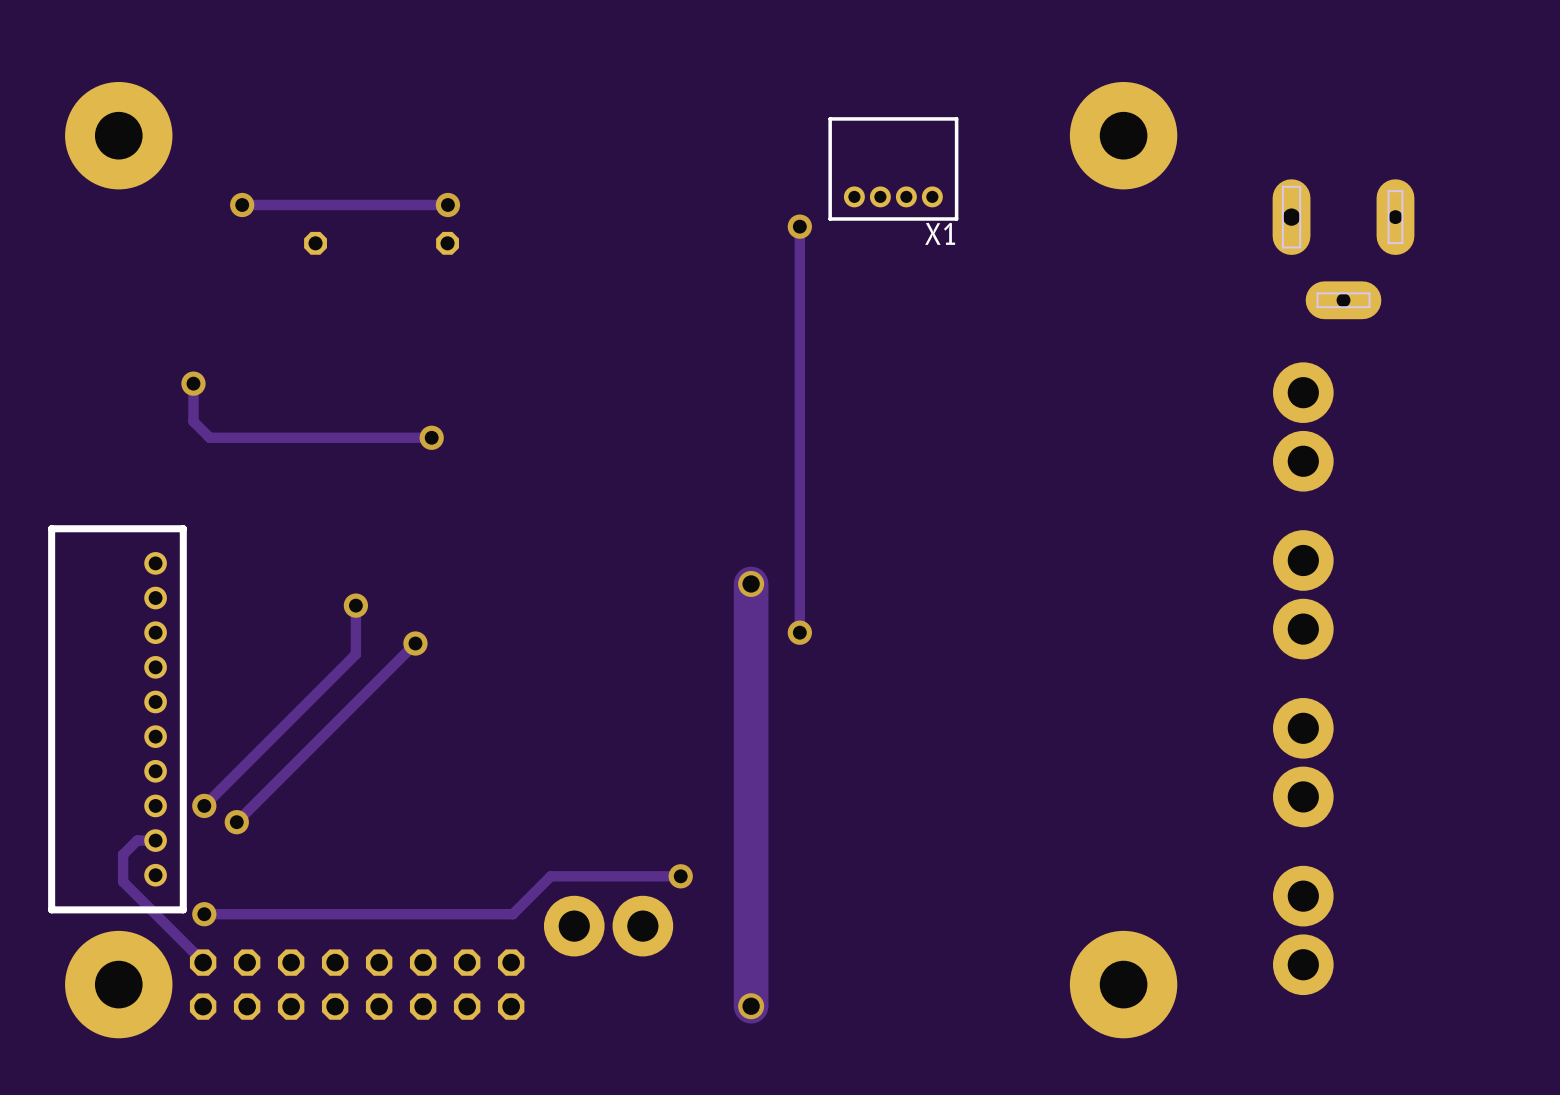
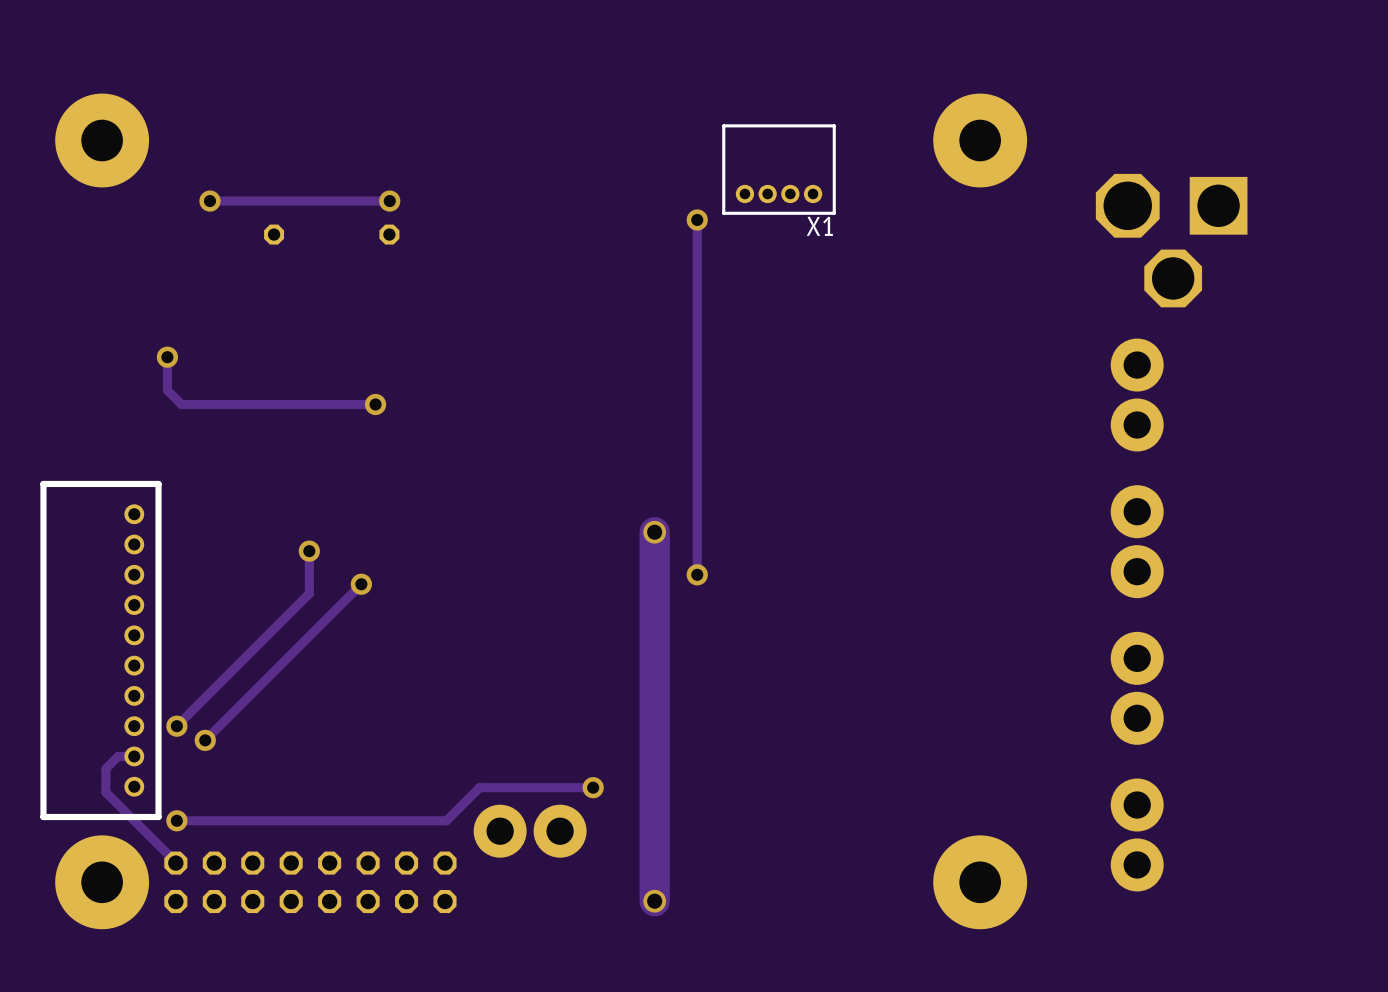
part footprint: [1272, 179, 1415, 320] -> [1095, 173, 1248, 308]

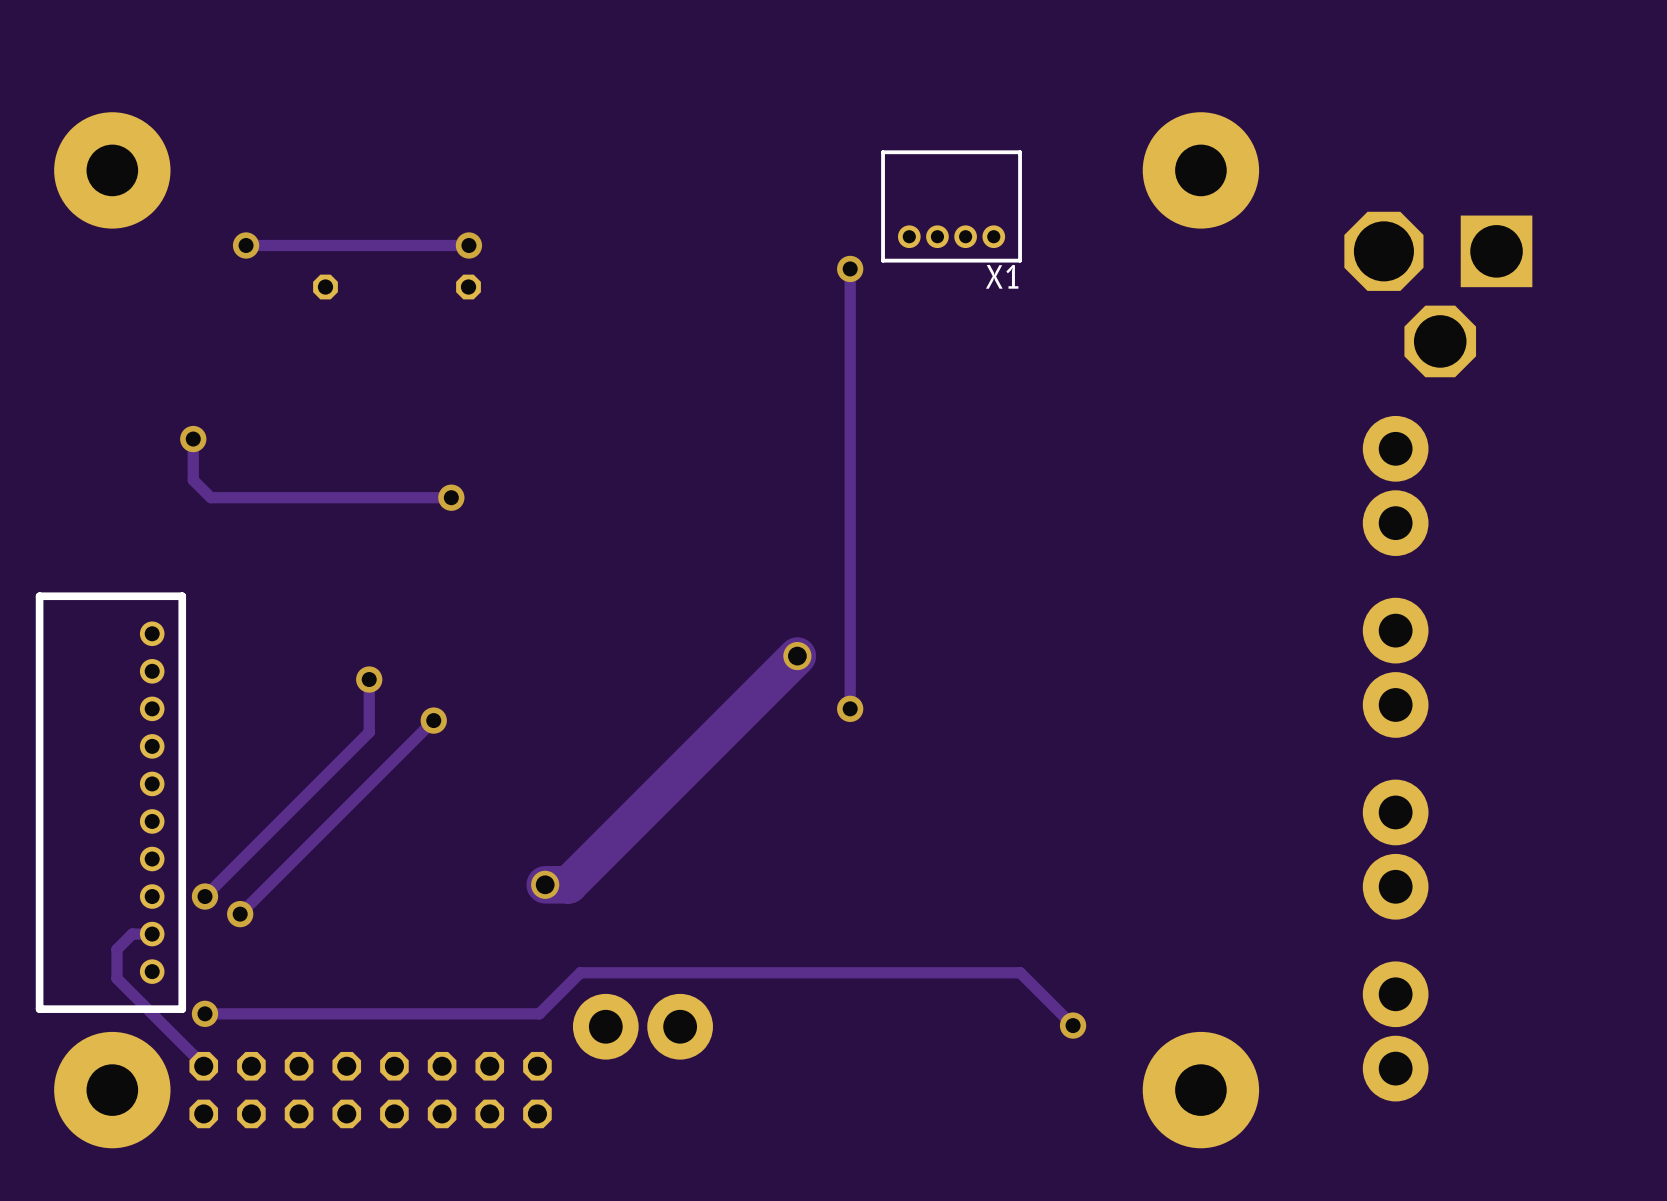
track: (654, 532) (654, 901) -> (797, 656) (568, 884) (545, 884)
via: none -> (545, 884)
track: none -> (721, 972) (1020, 972) (1073, 1025)
via: (593, 787) -> none
via: none -> (1073, 1025)
via: (654, 901) -> none

